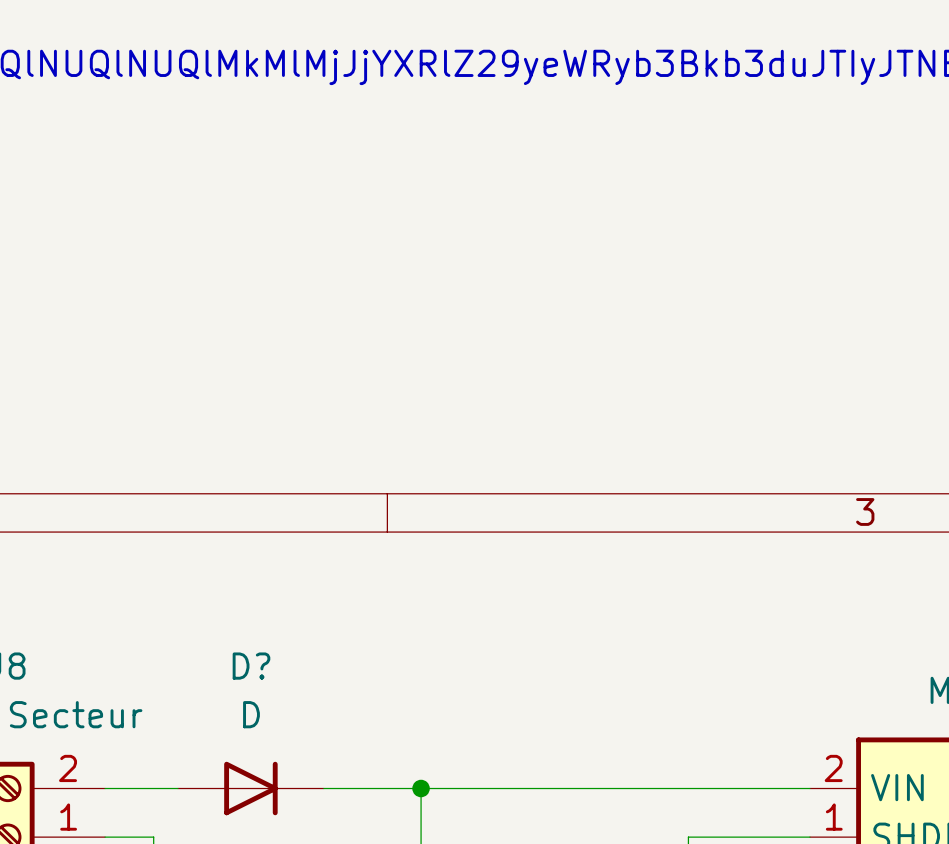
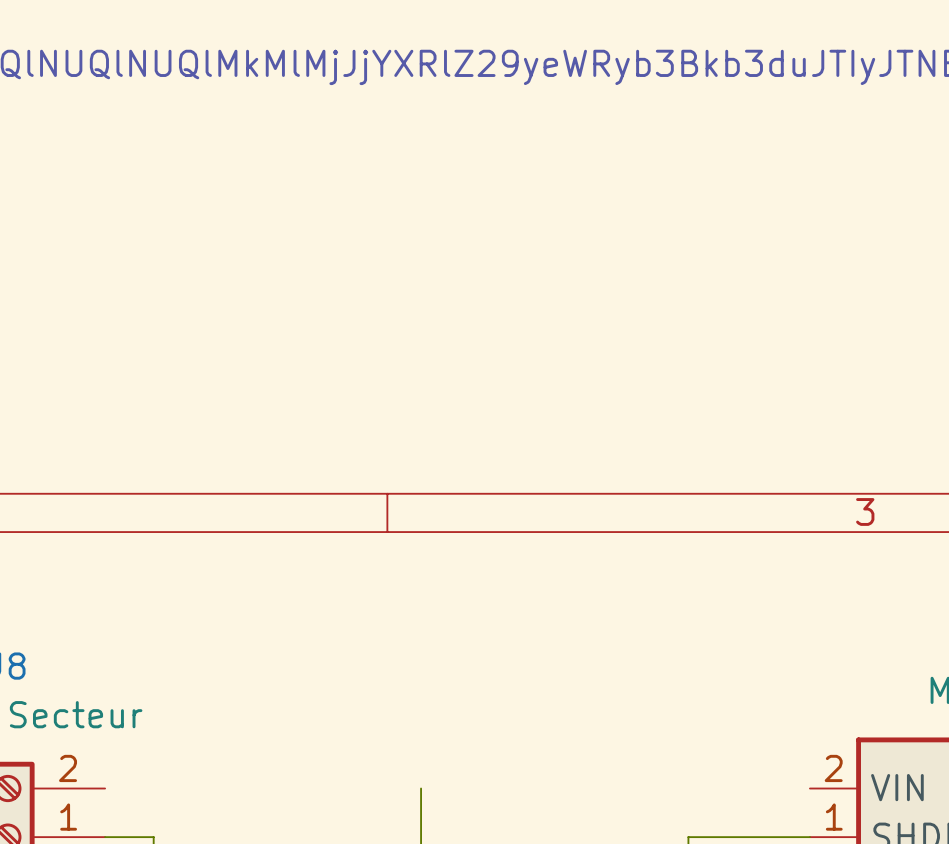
wire: (105, 788) (177, 788) -> none
D?: D (250, 788) -> none
wire: (323, 788) (809, 788) -> none
junction: (421, 788) -> none

